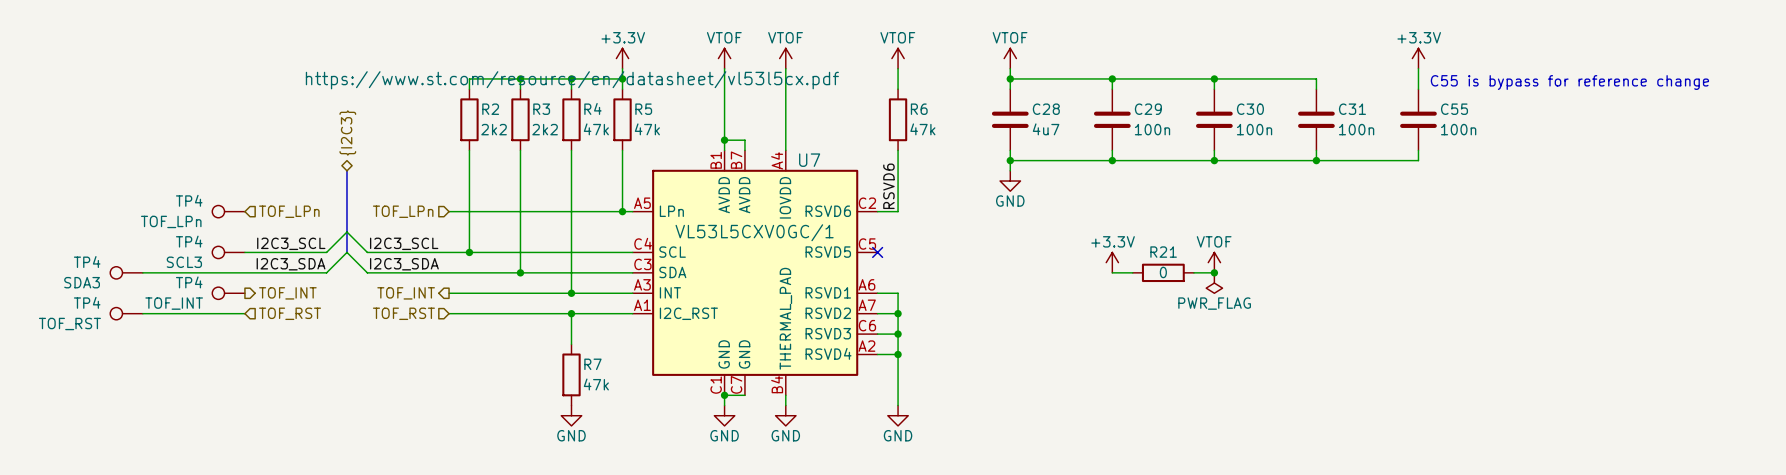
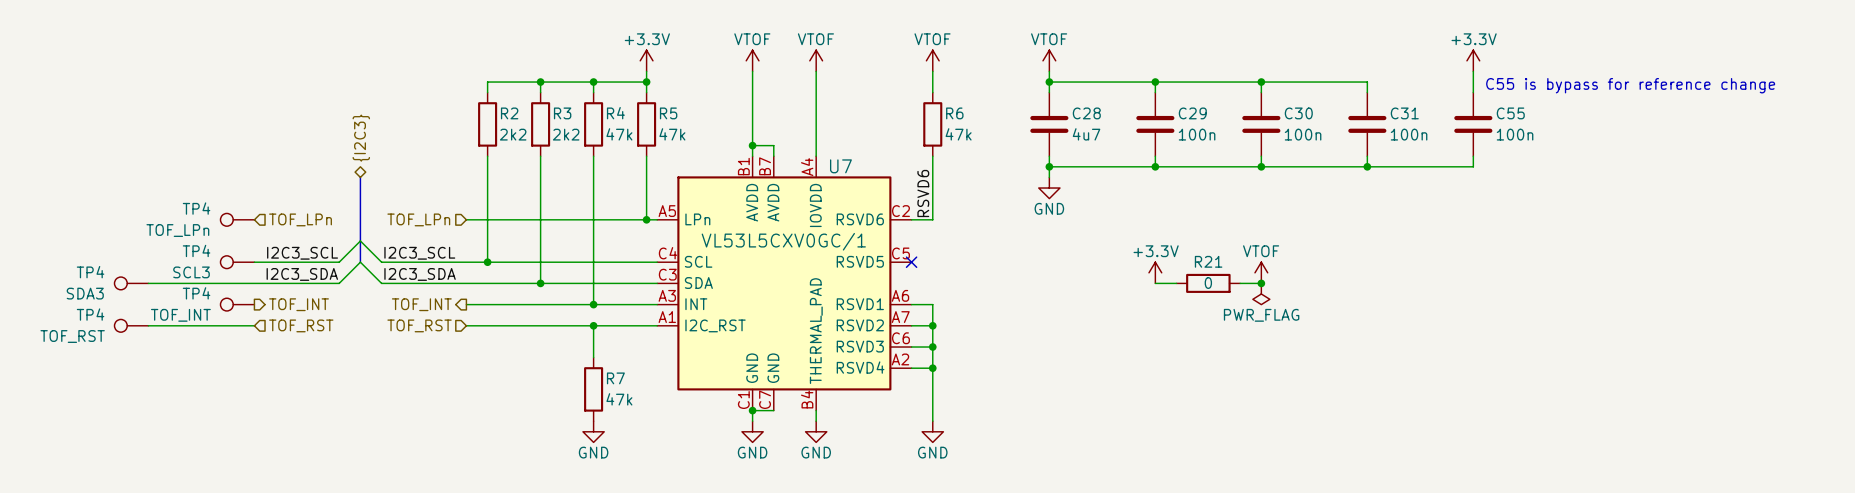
U7 text: https://www.st.com/resource/en/datasheet/vl53l5cx.pdf (572, 80) -> none

